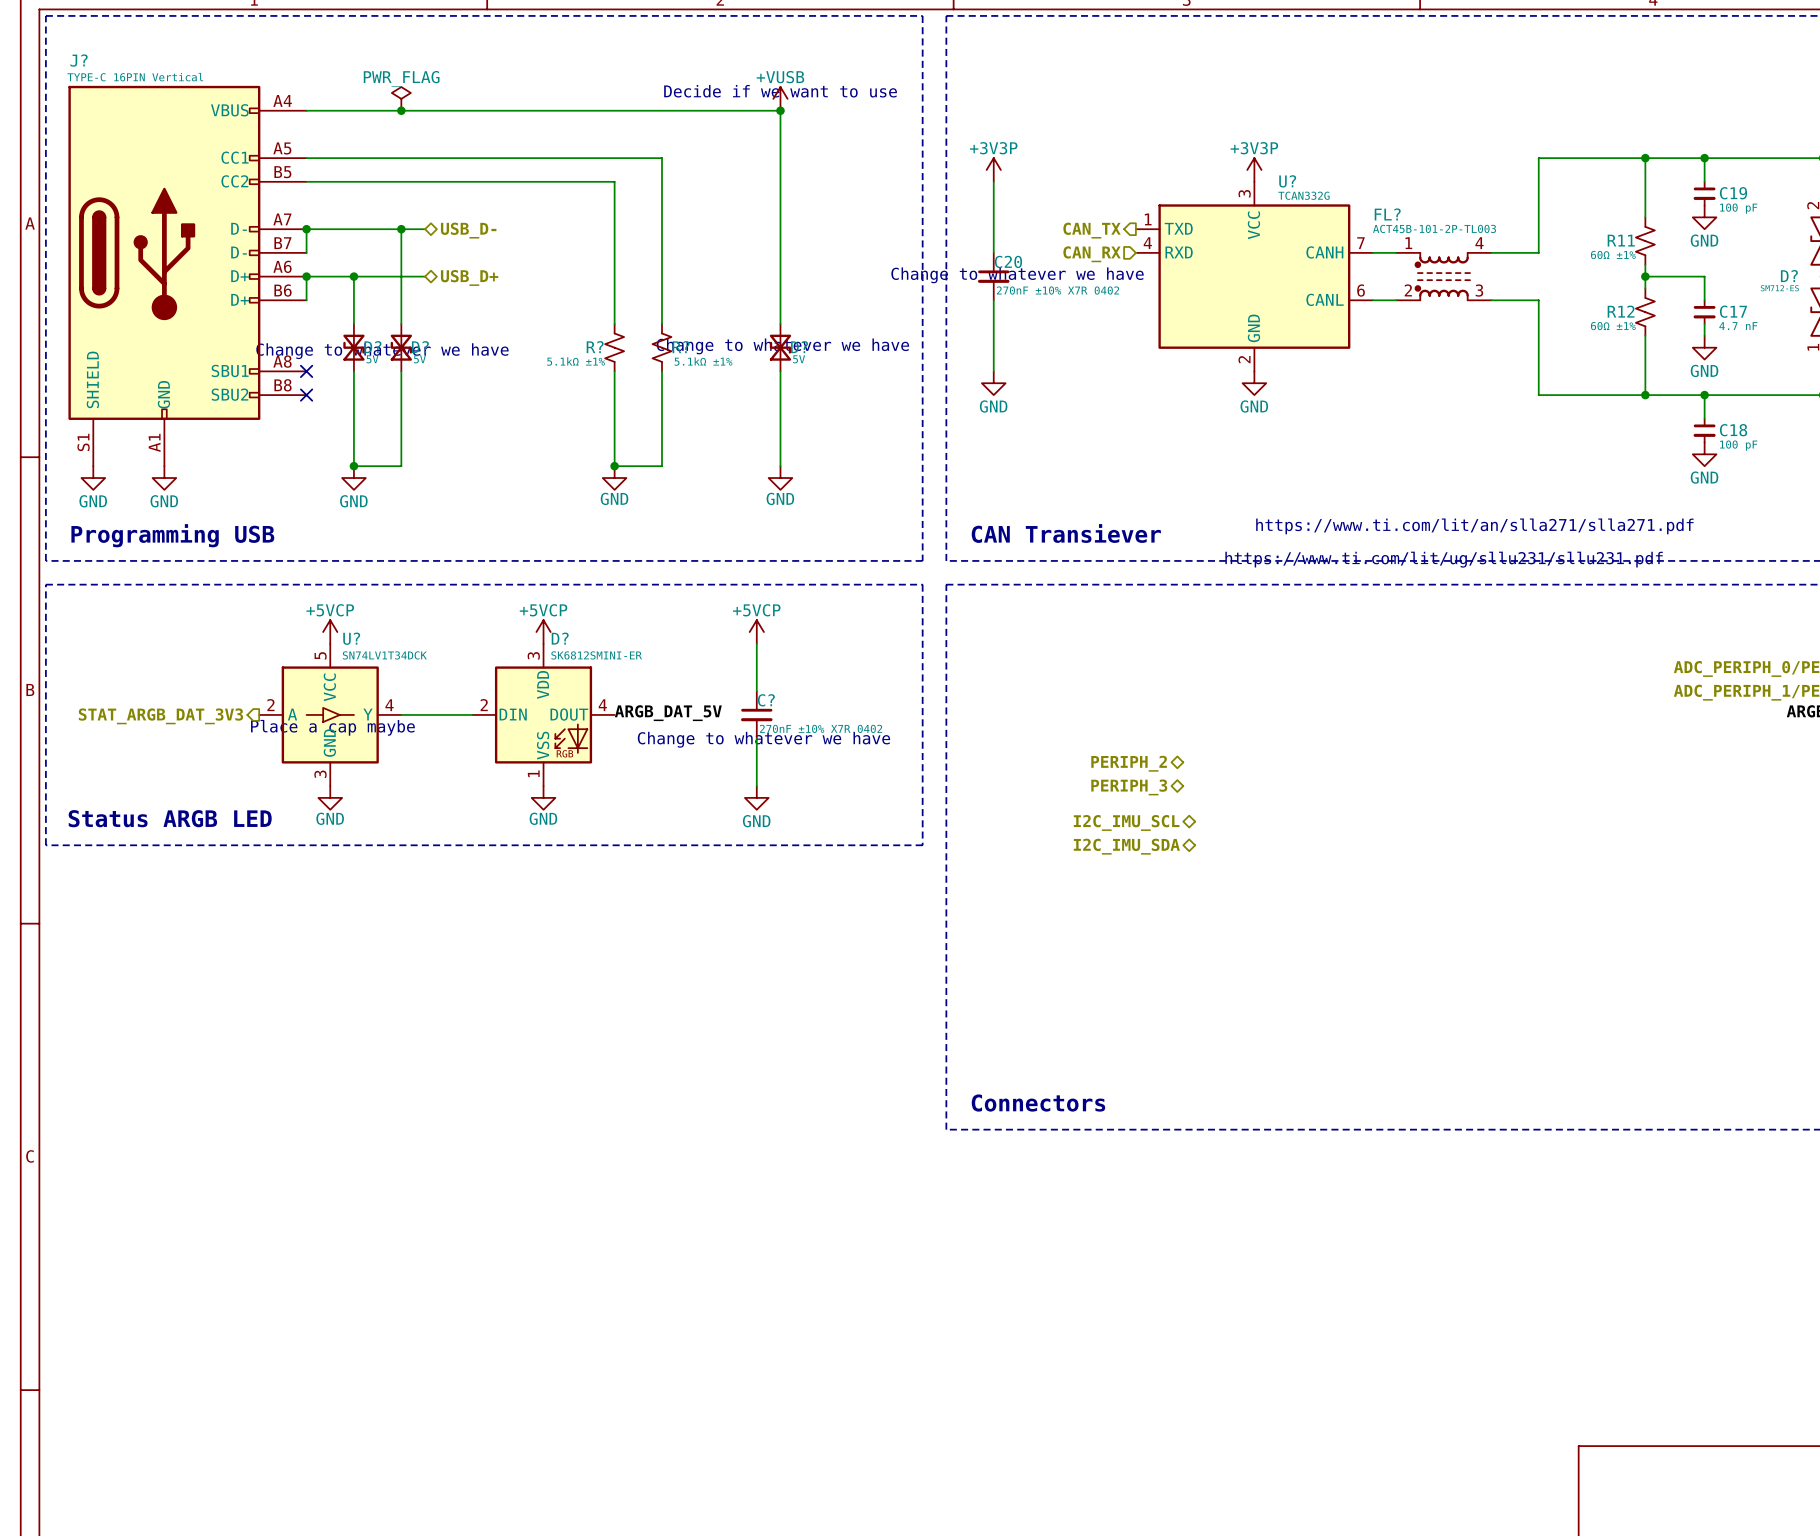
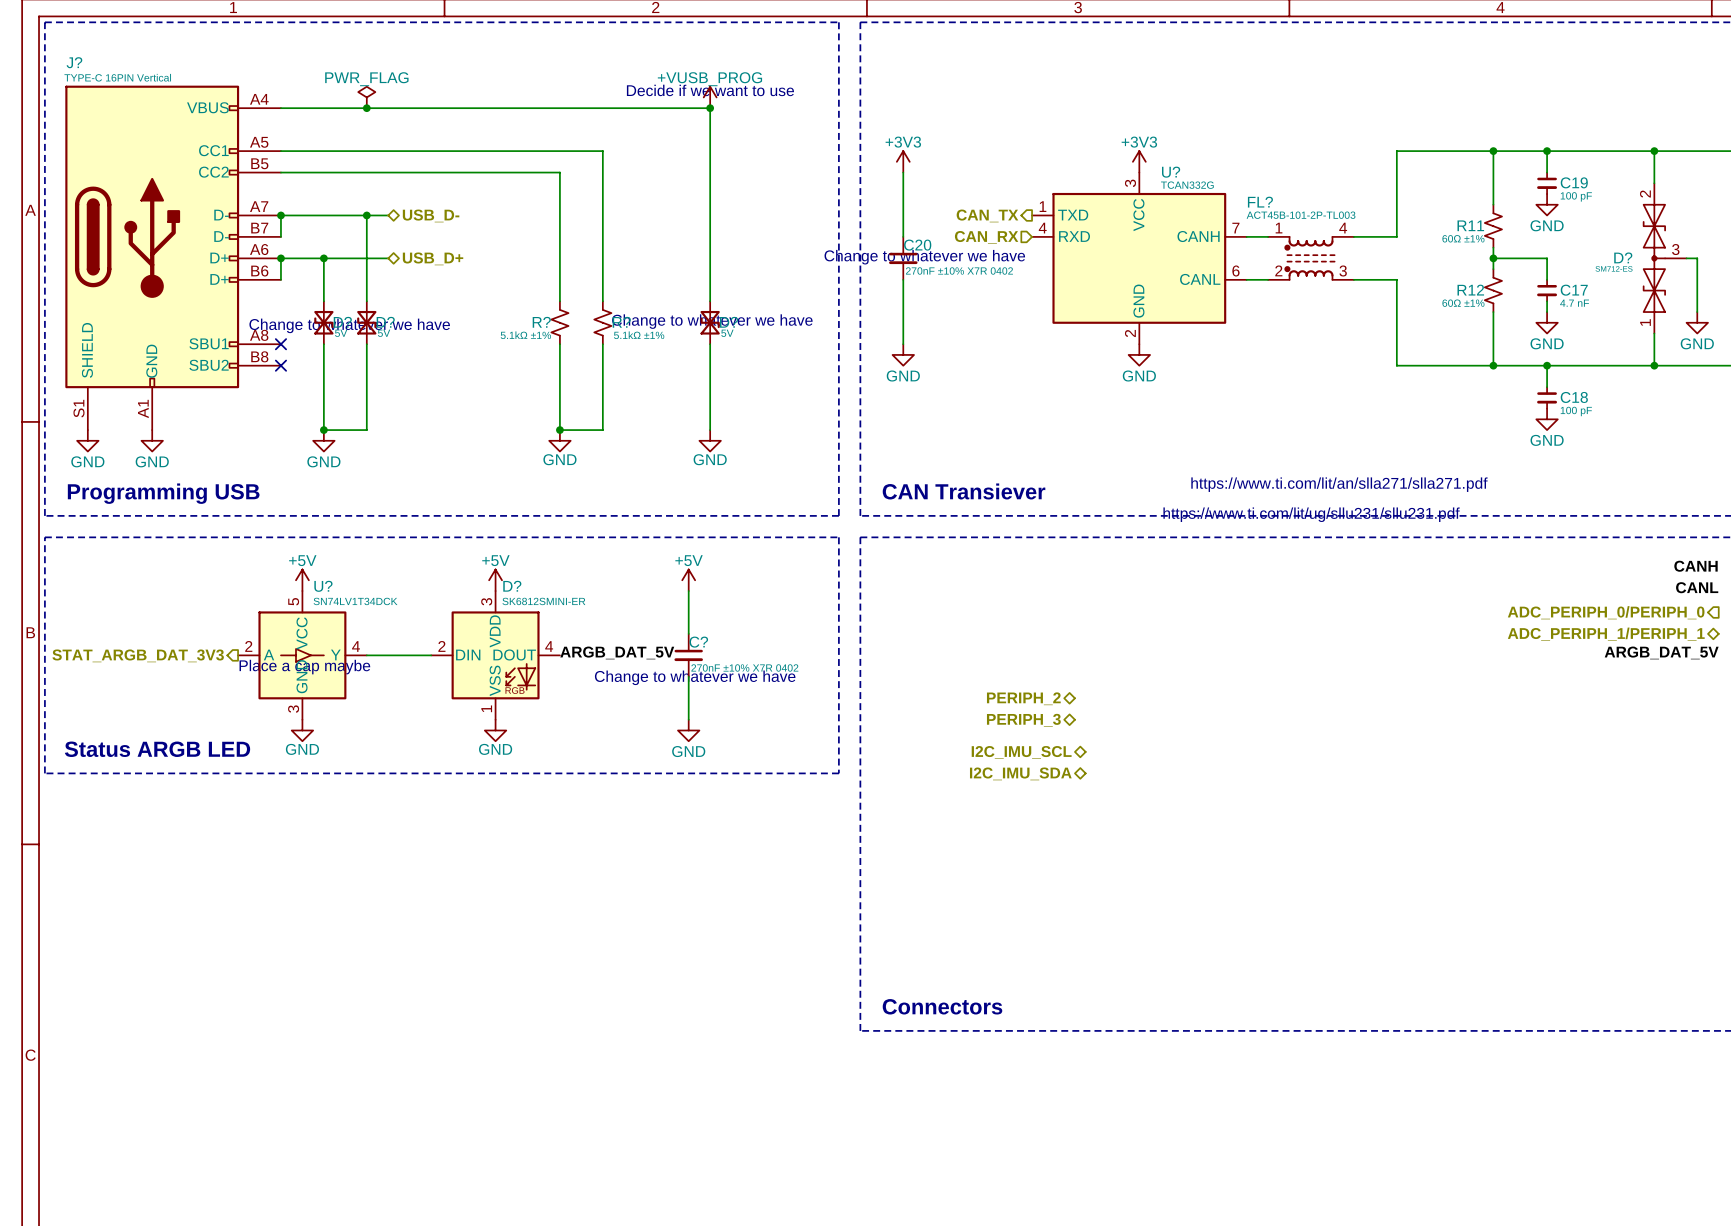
power symbol: +VUSB (780, 98) -> +VUSB_PROG (710, 97)
power symbol: +3V3P (993, 169) -> +3V3 (903, 161)
power symbol: +3V3P (1254, 169) -> +3V3 (1139, 161)
power symbol: +5VCP (330, 632) -> +5V (302, 580)
power symbol: +5VCP (543, 632) -> +5V (495, 580)
power symbol: +5VCP (756, 632) -> +5V (688, 580)

